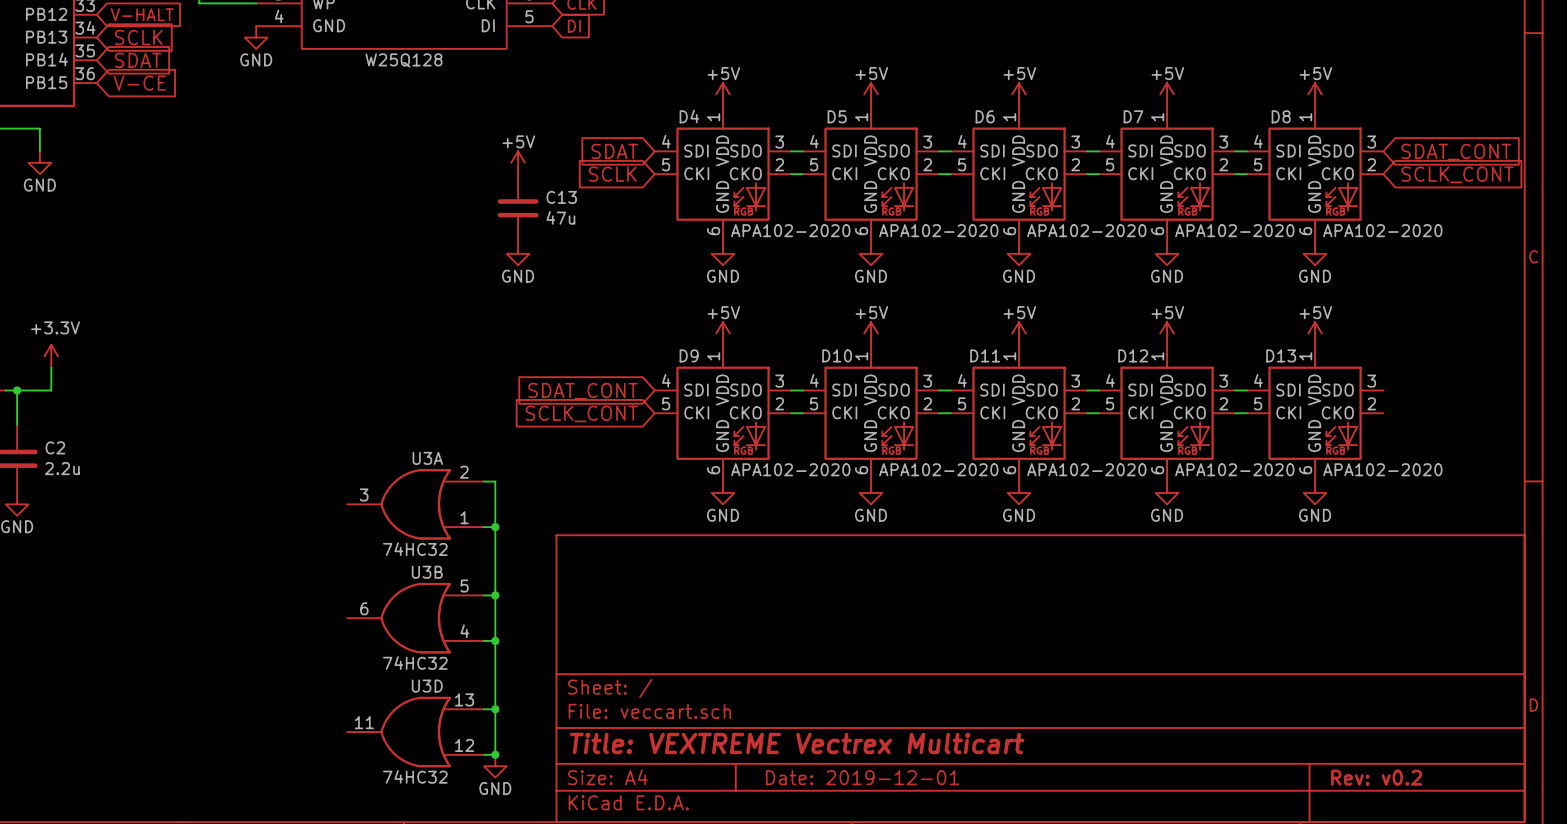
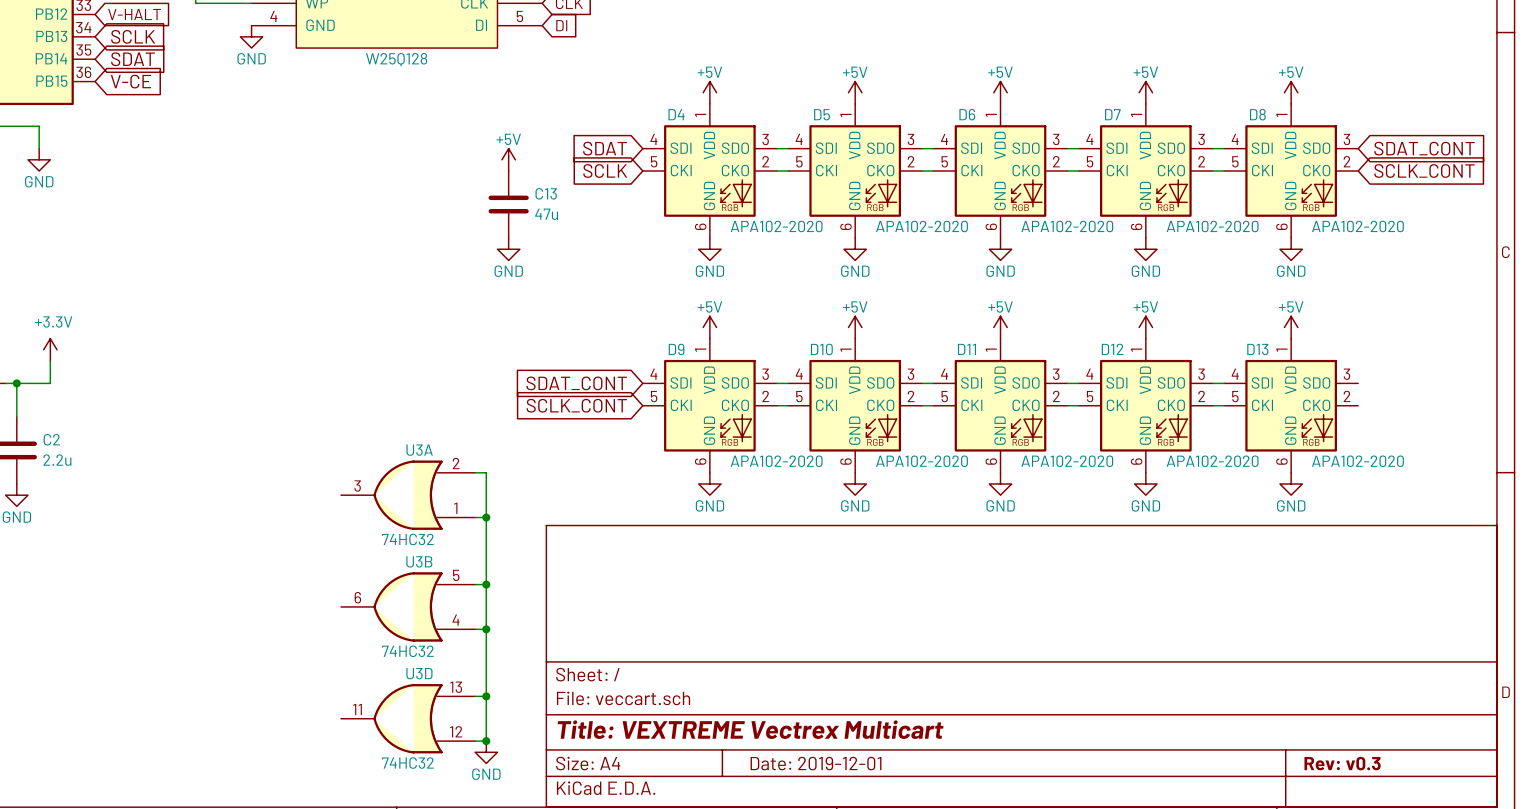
title block: Rev: v0.2 (1376, 777) -> Rev: v0.3 (1342, 763)

